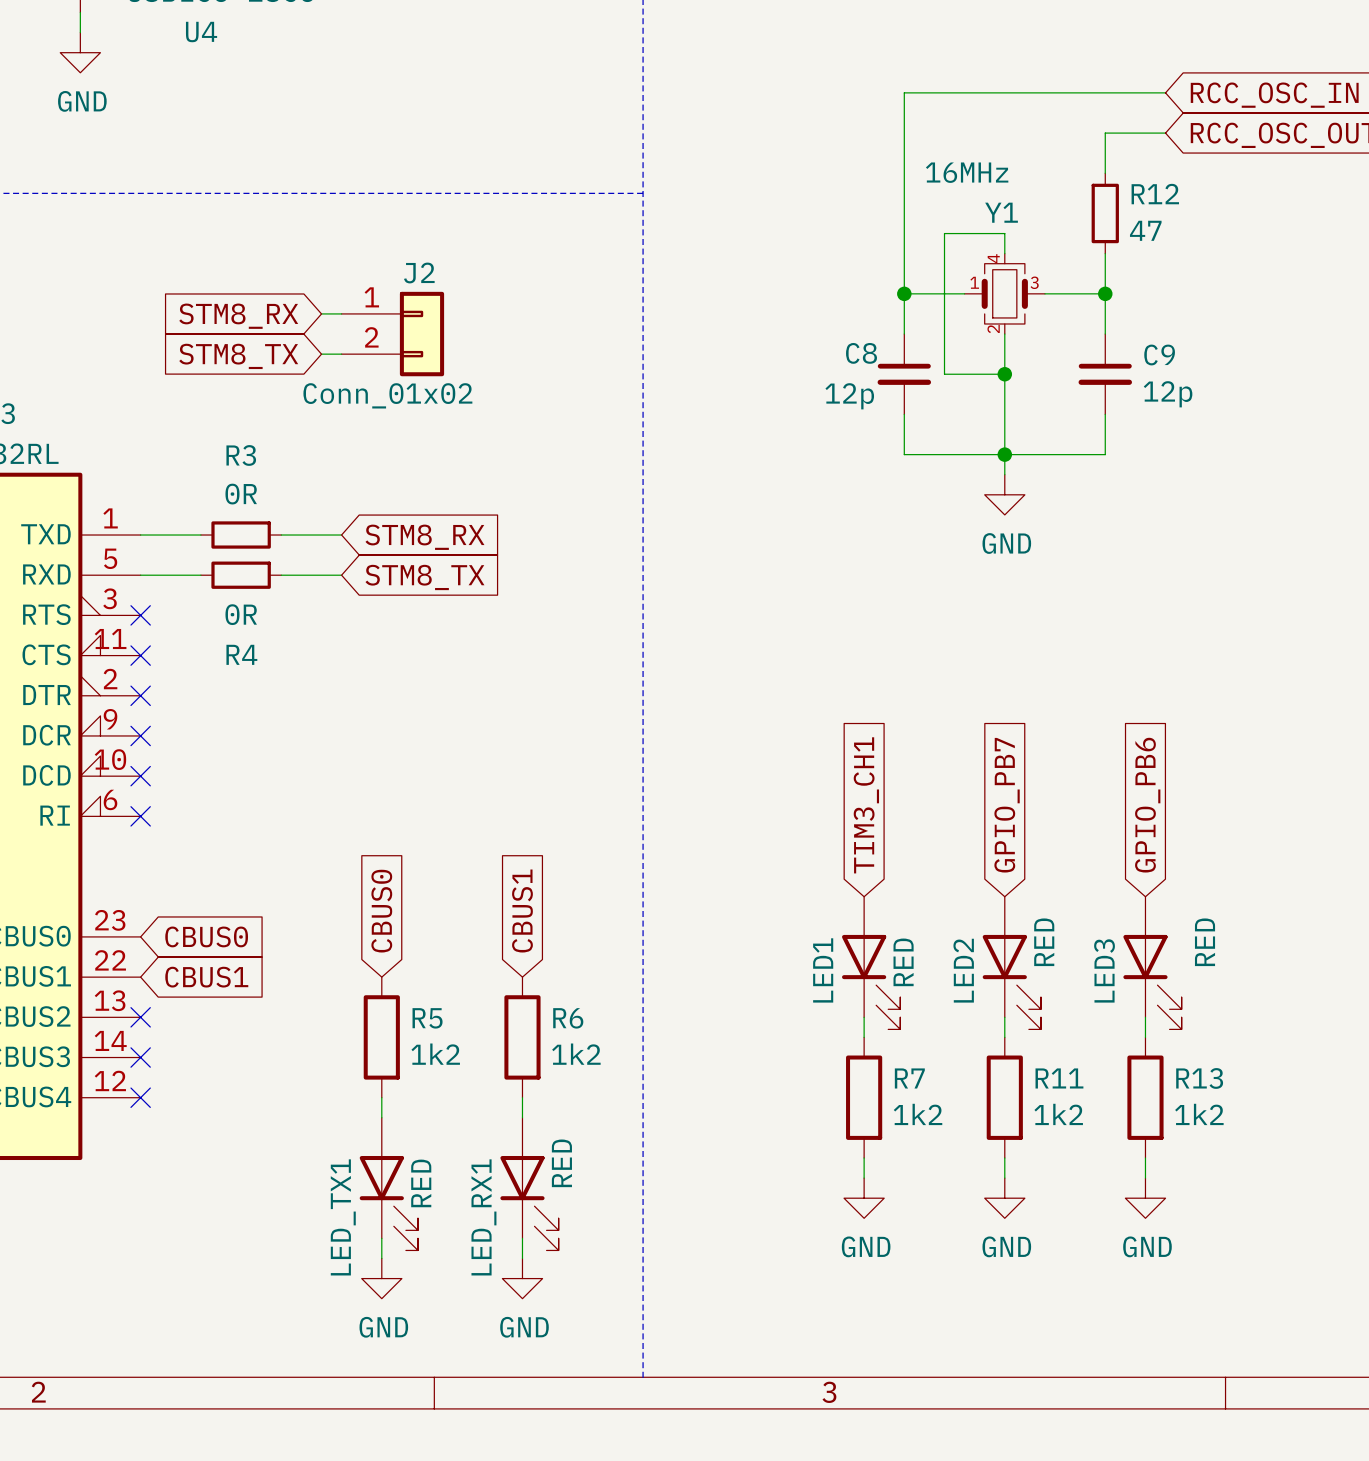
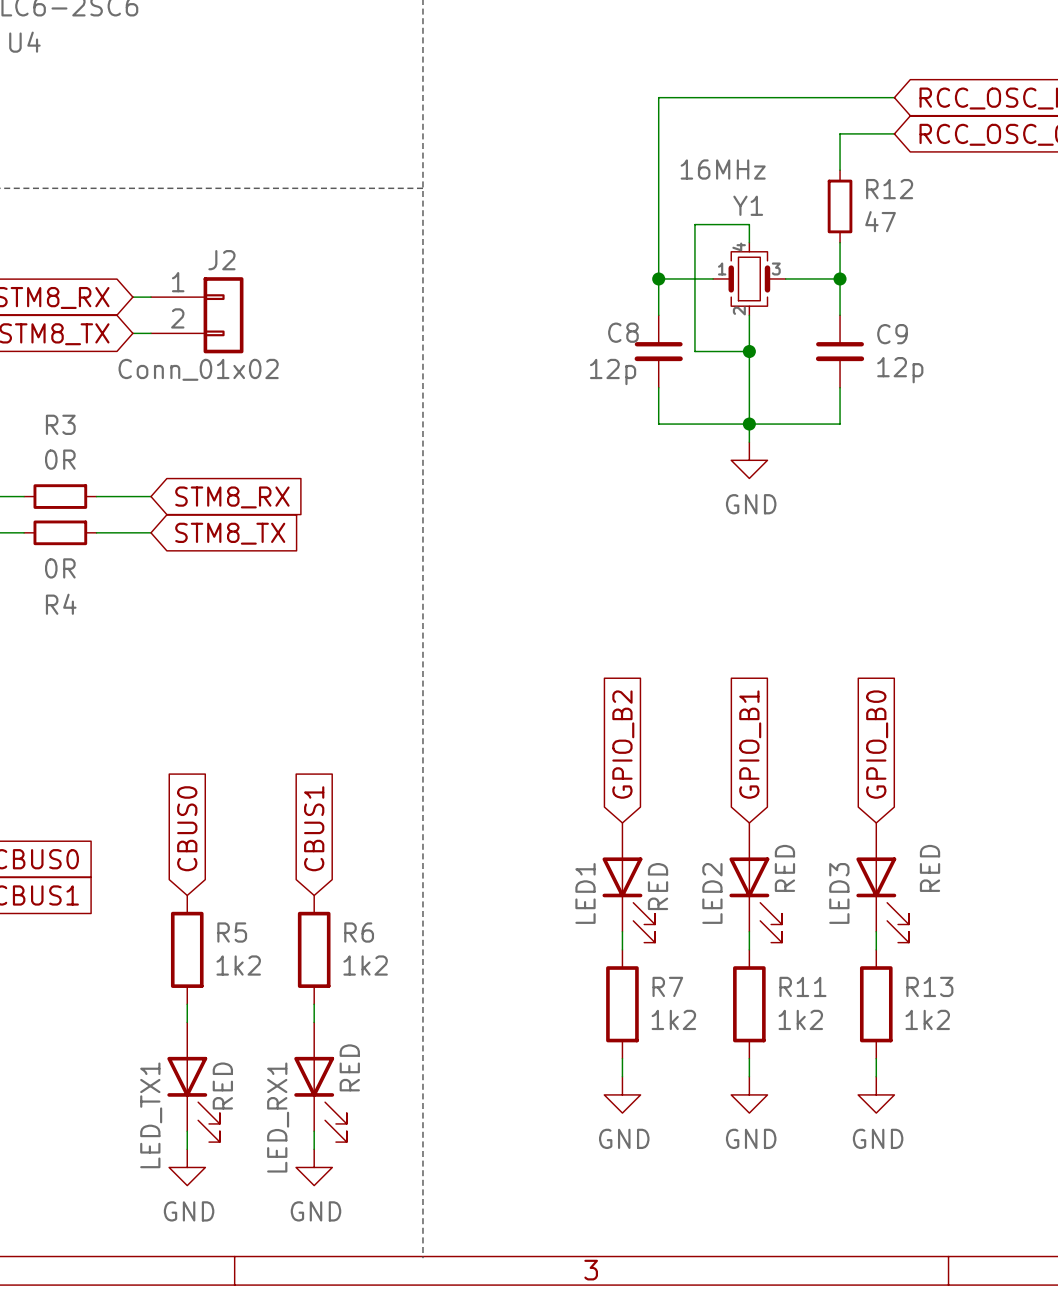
global label: TIM3_CH1 (866, 805) -> GPIO_B2 (623, 744)
global label: GPIO_PB7 (1007, 805) -> GPIO_B1 (750, 744)
global label: GPIO_PB6 (1147, 805) -> GPIO_B0 (877, 744)

